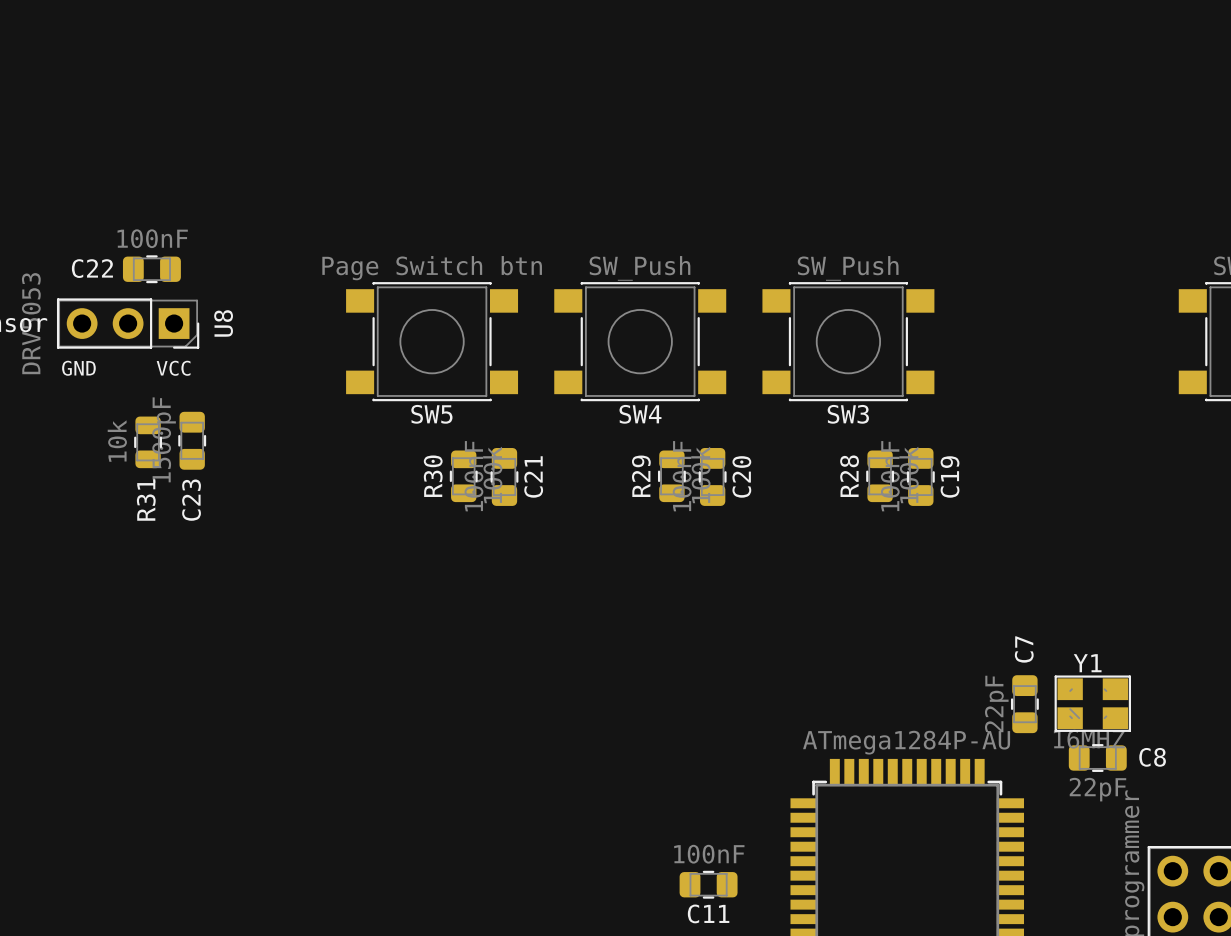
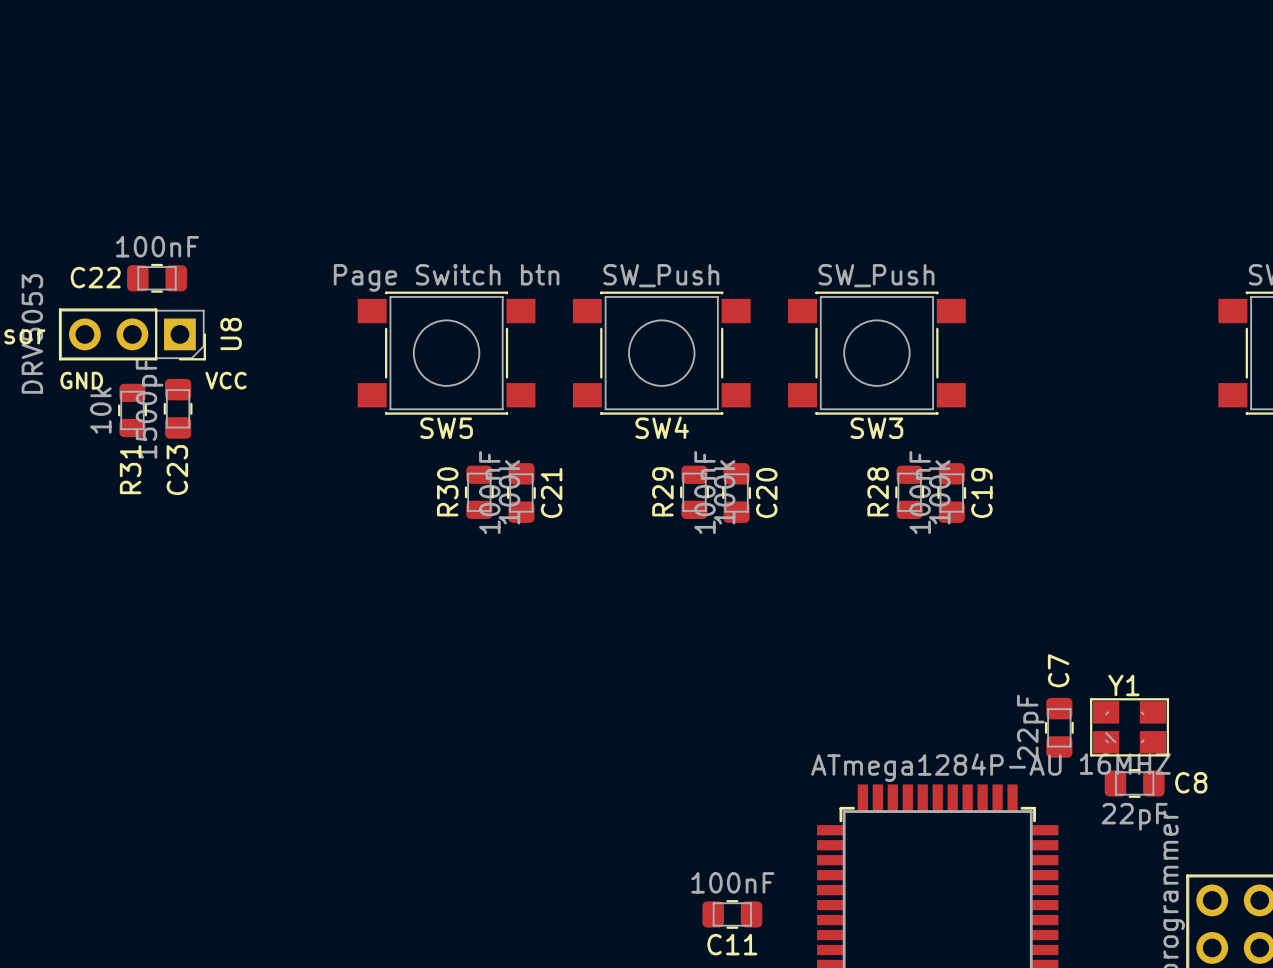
text position: VCC (173, 368) -> VCC (226, 380)
C23 position: (192, 440) -> (178, 408)
R31 position: (148, 442) -> (132, 410)

